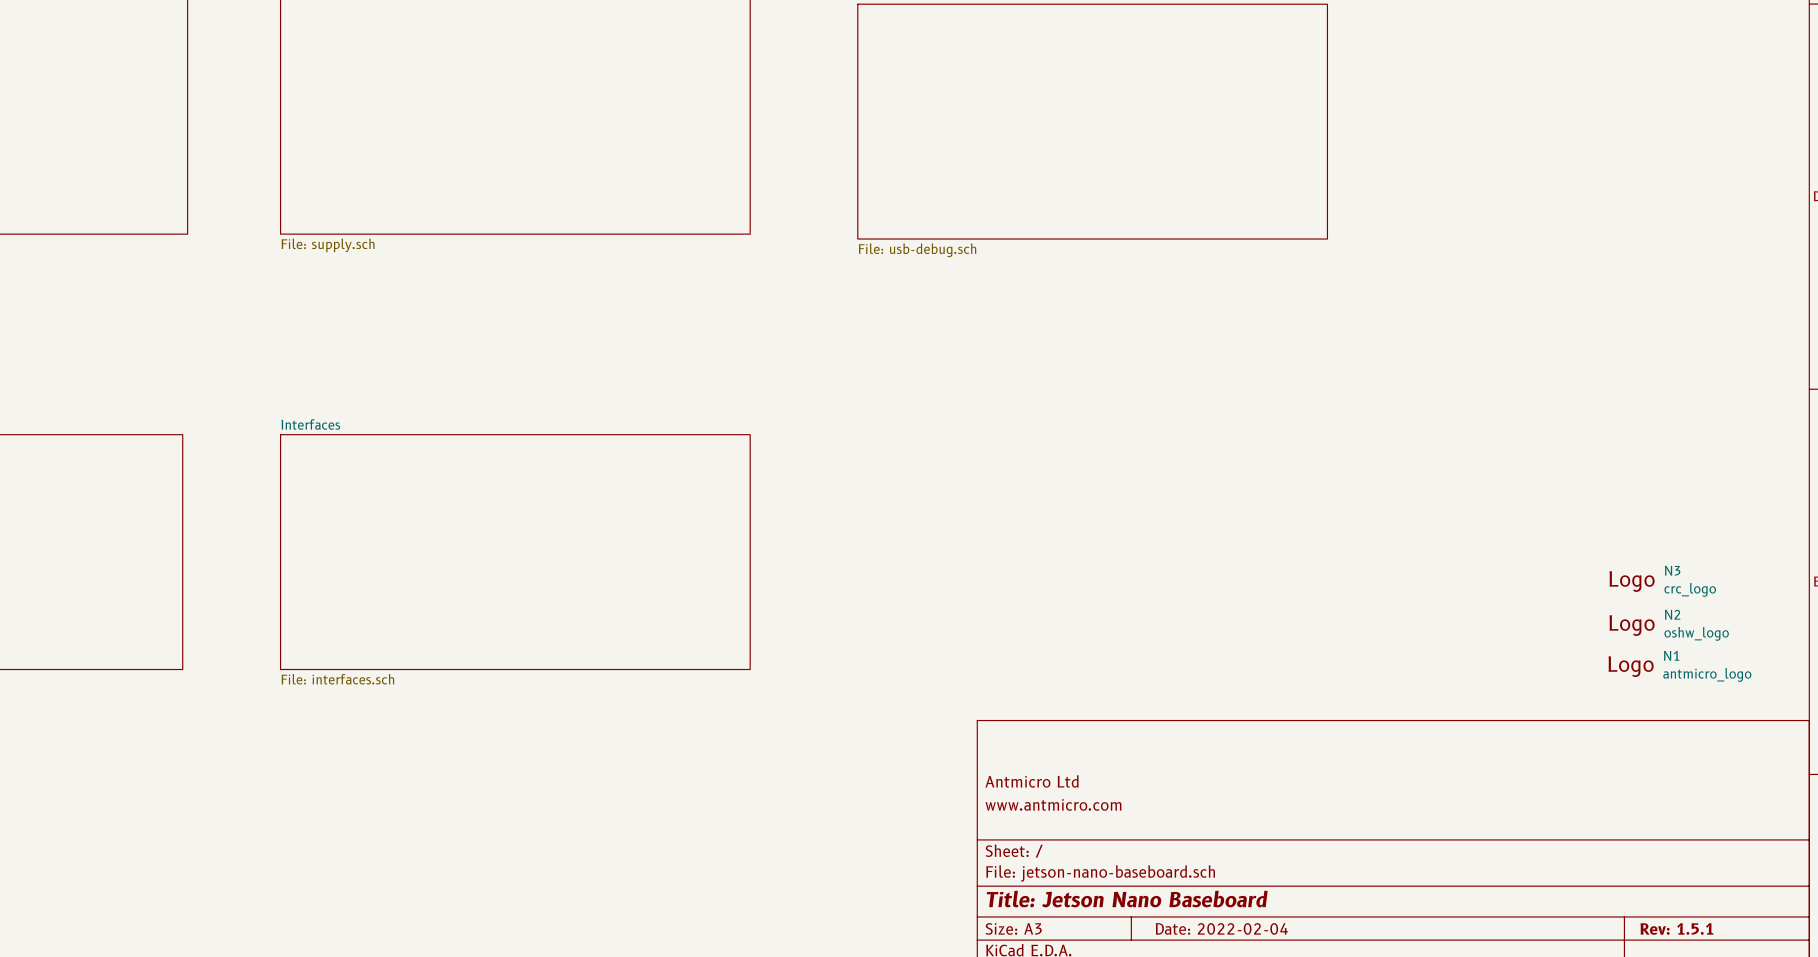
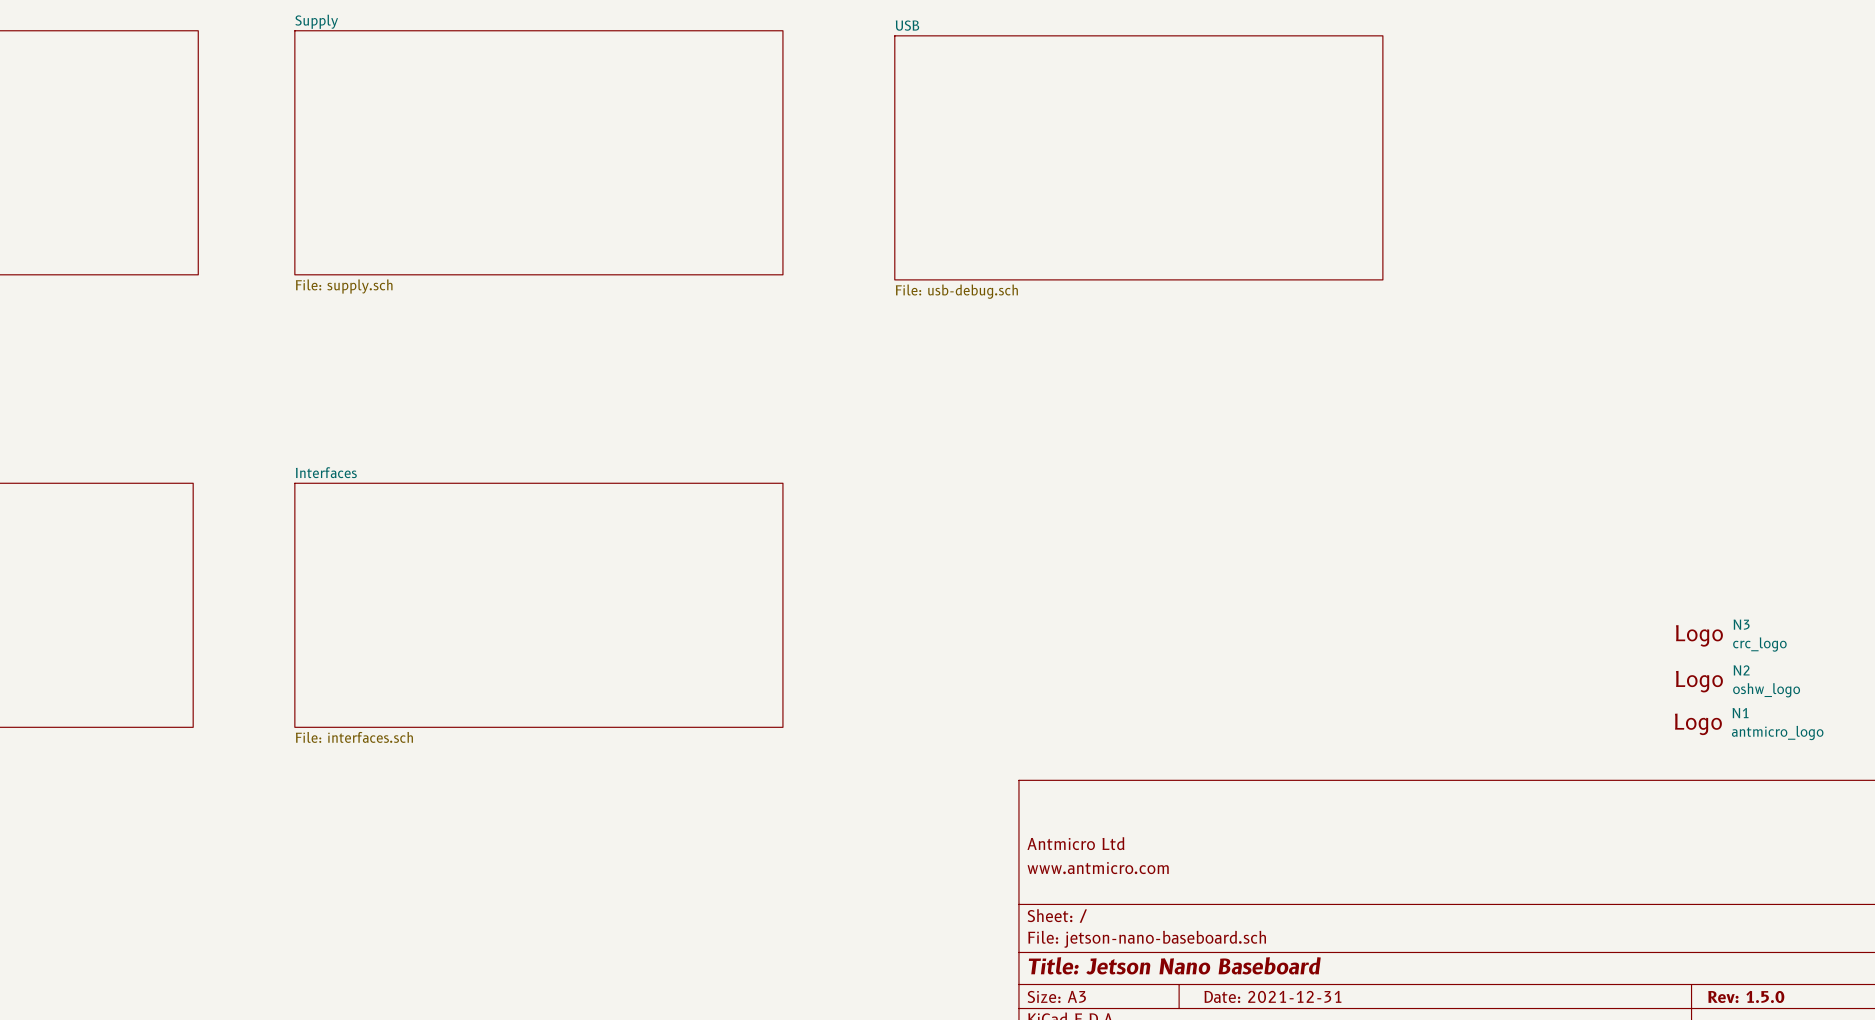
title block: Date: 2022-02-04 (1221, 928) -> Date: 2021-12-31 (1272, 996)
title block: Rev: 1.5.1 (1676, 928) -> Rev: 1.5.0 (1746, 996)

